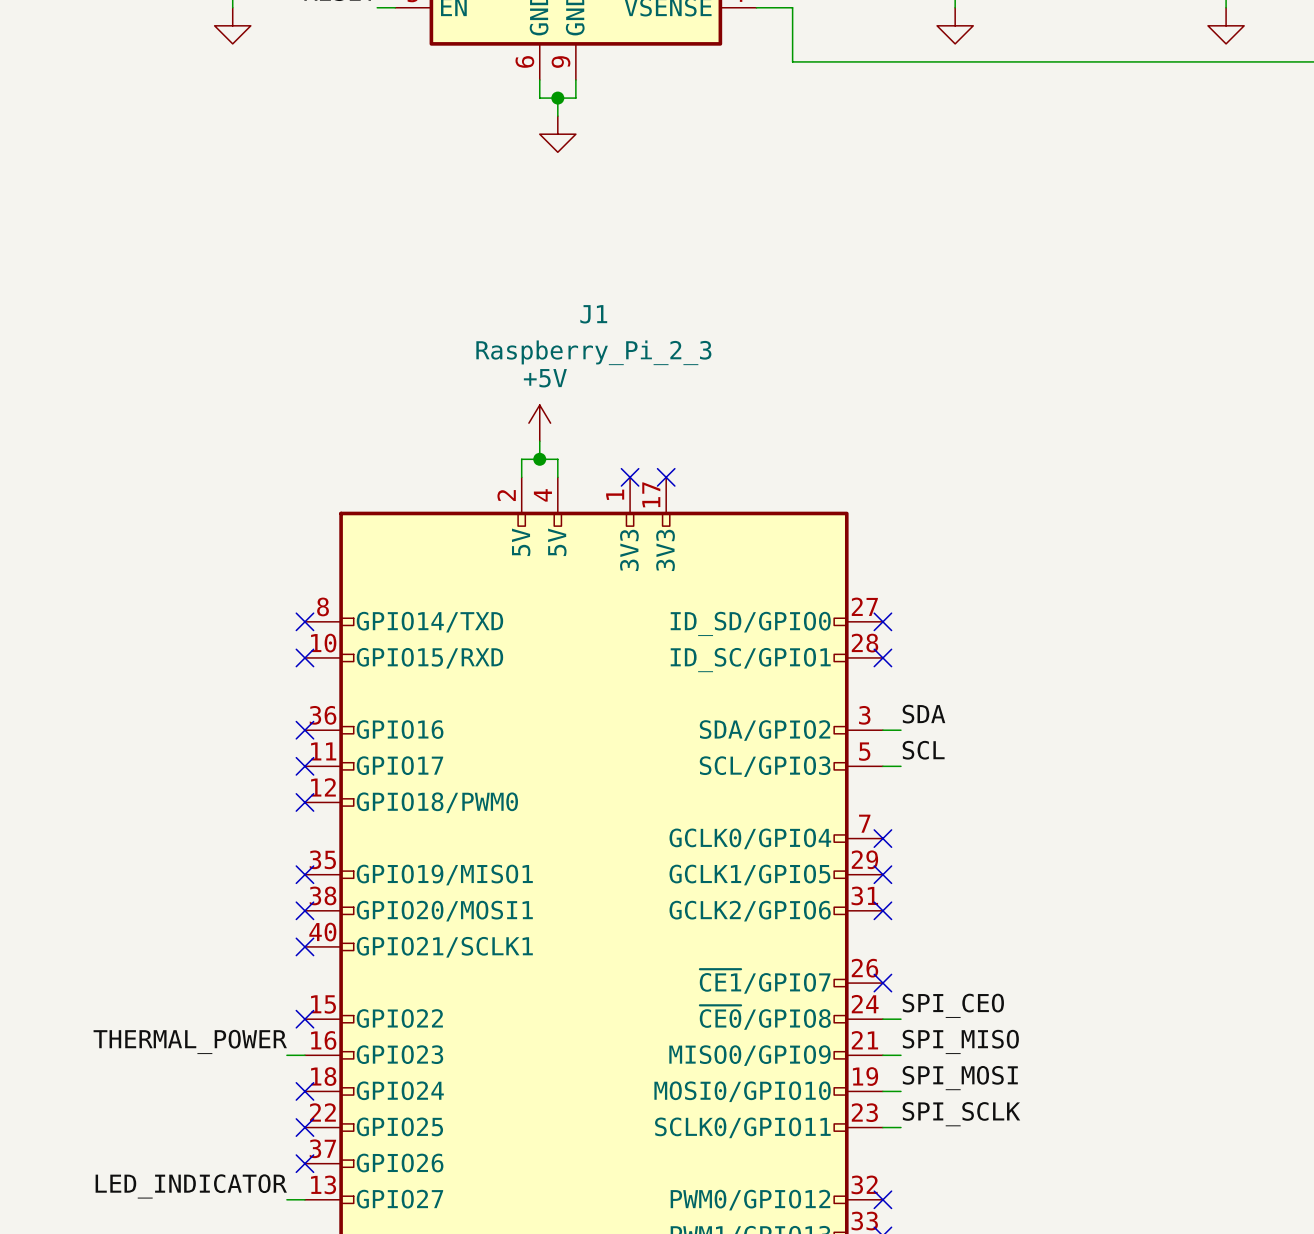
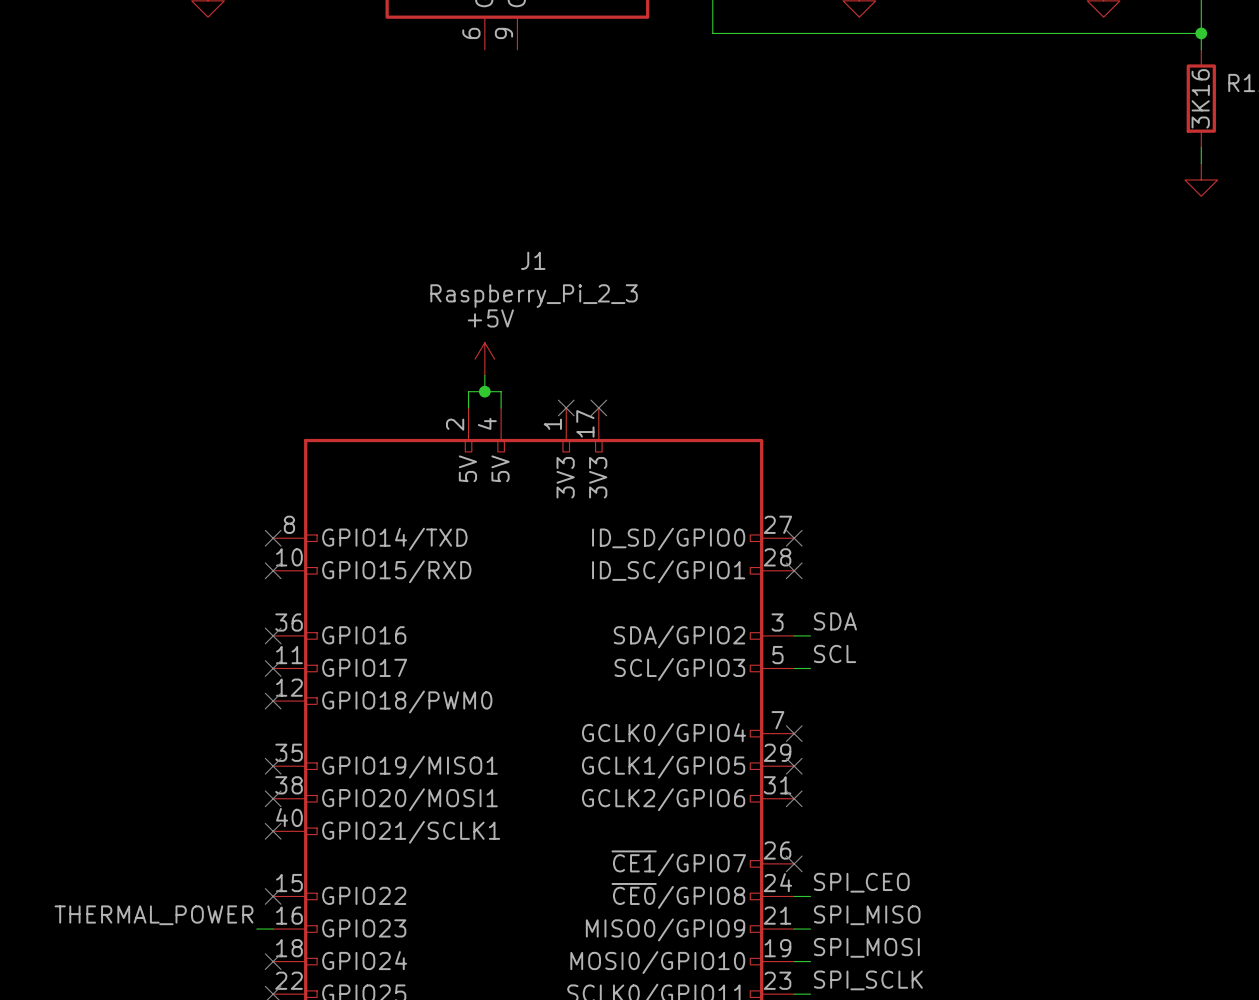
wire: (539, 80) (539, 98) (575, 98) (575, 80) -> none
wire: (557, 98) (557, 116) -> none
junction: (557, 98) -> none
power symbol: (557, 134) -> none

